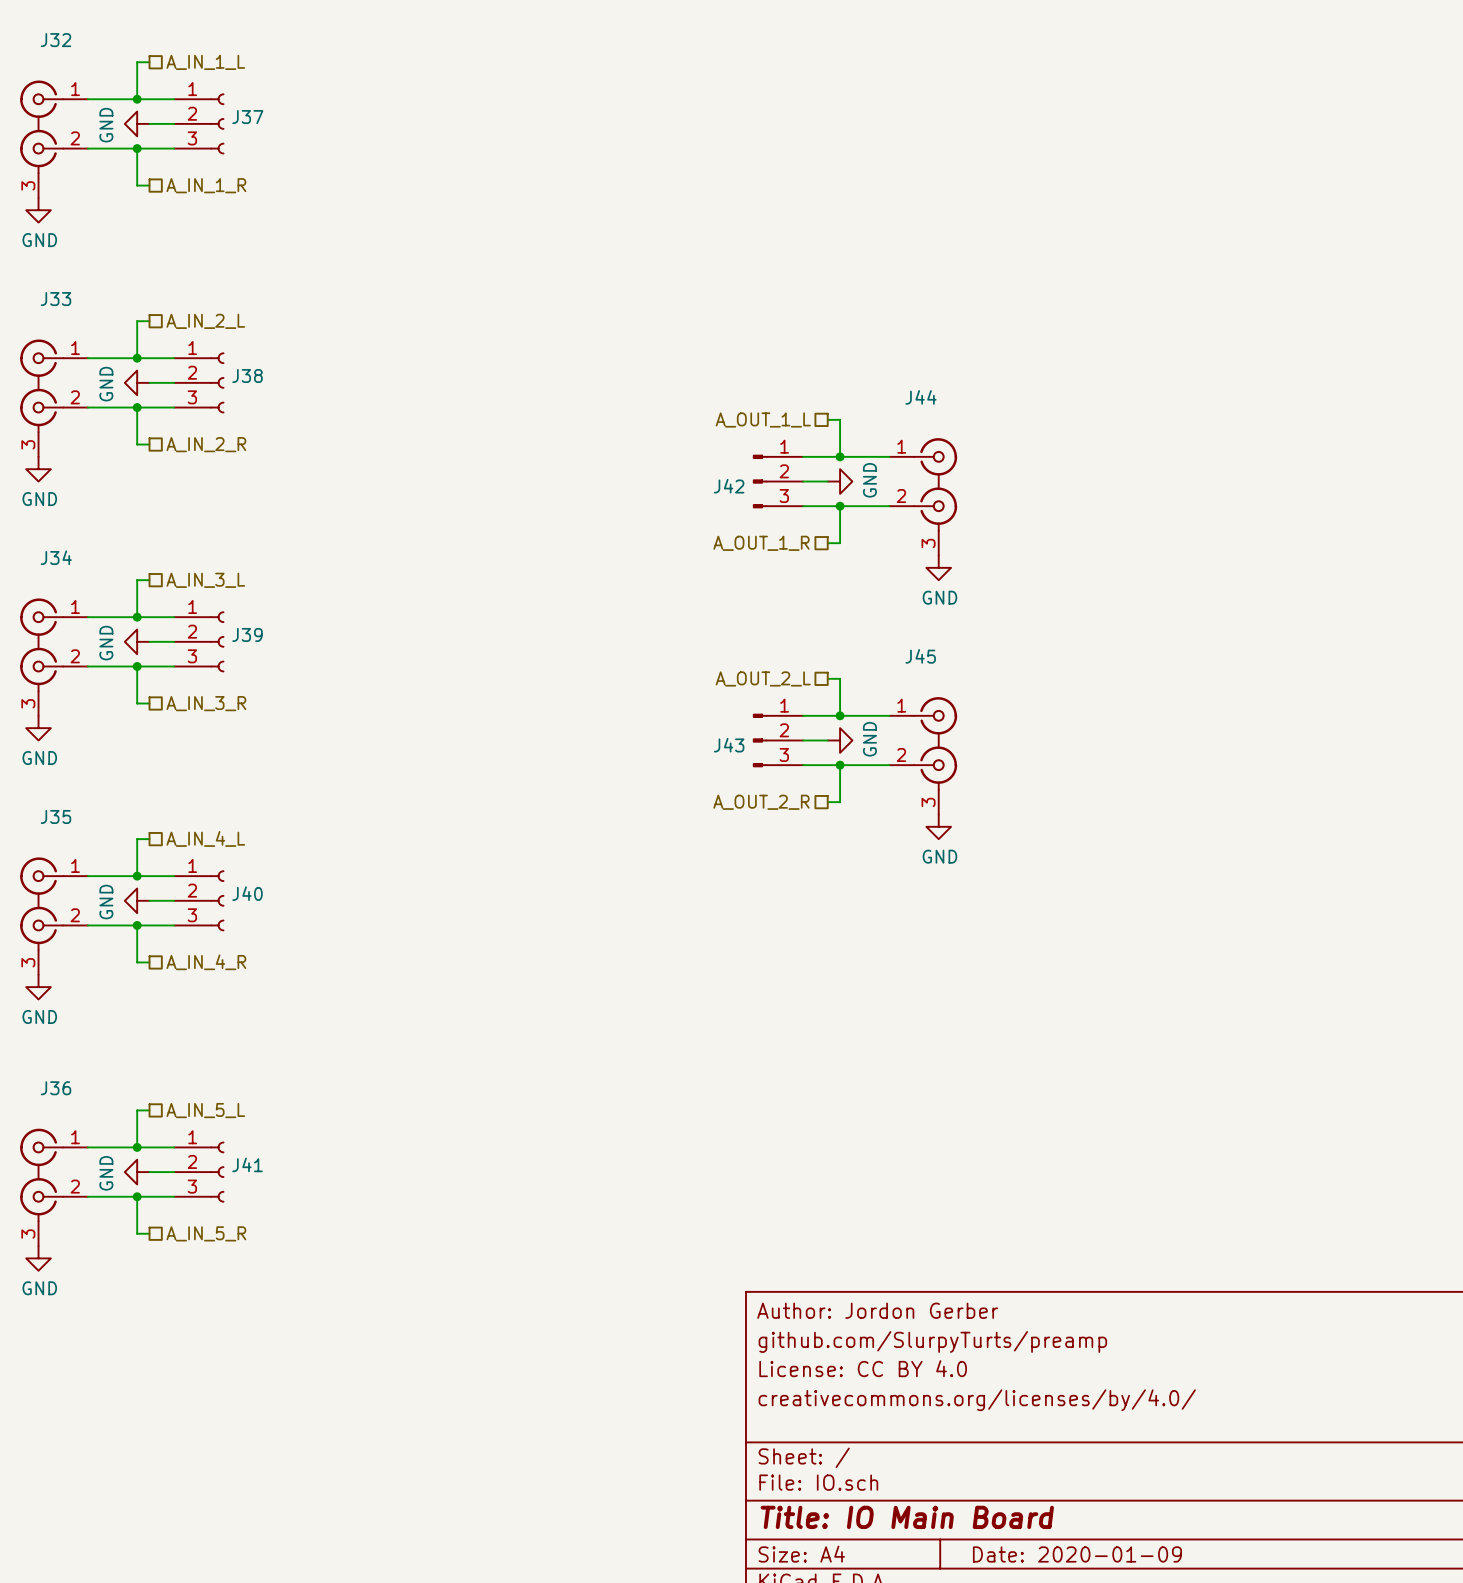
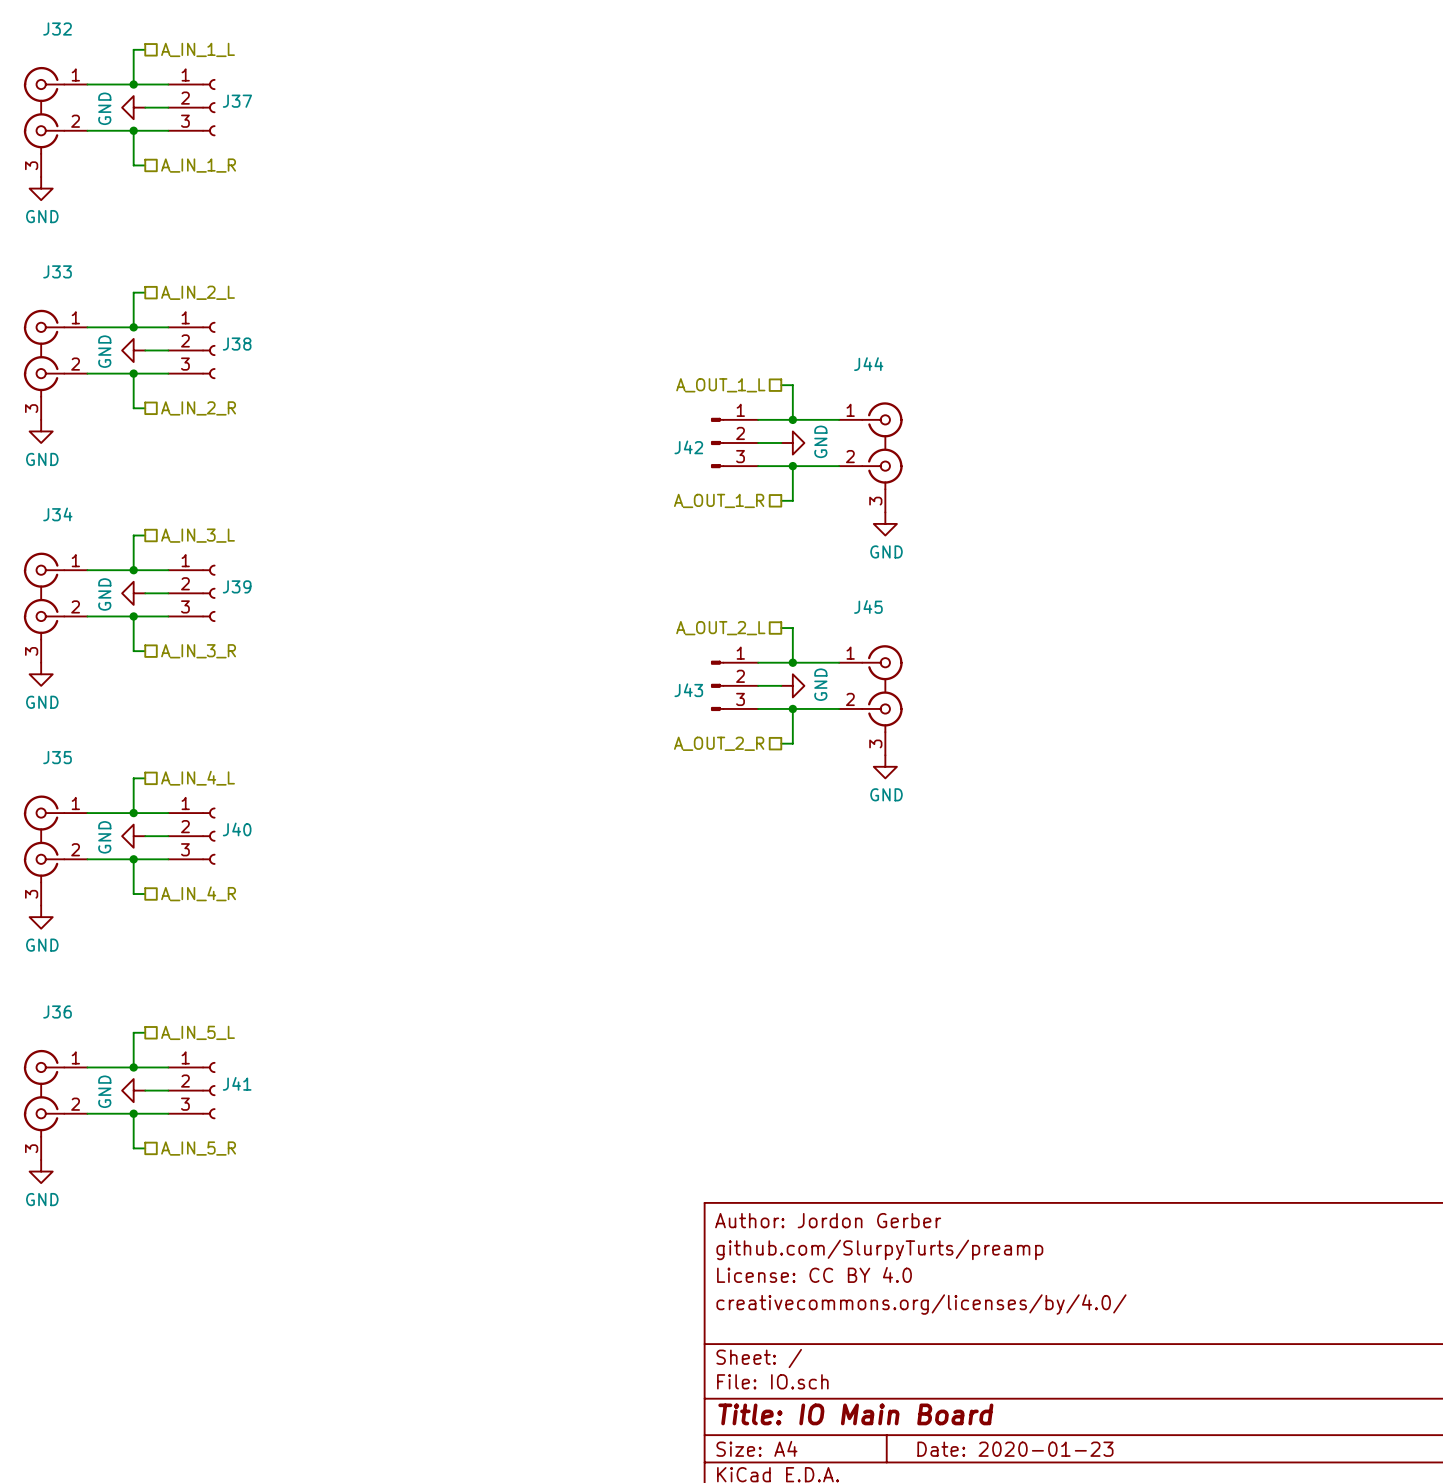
title block: Date: 2020-01-09 (1077, 1554) -> Date: 2020-01-23 (1015, 1449)

